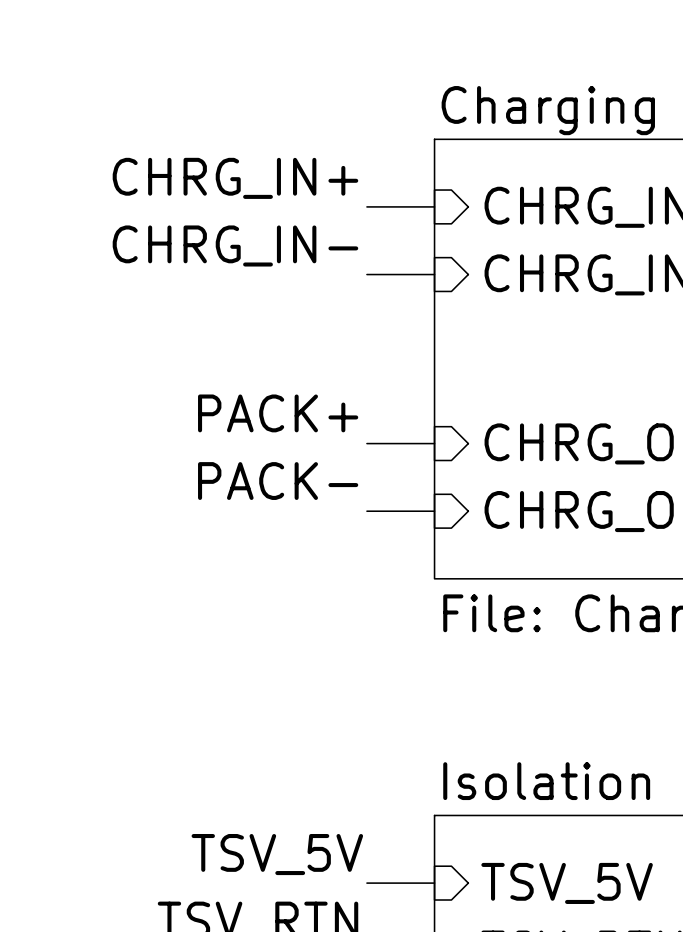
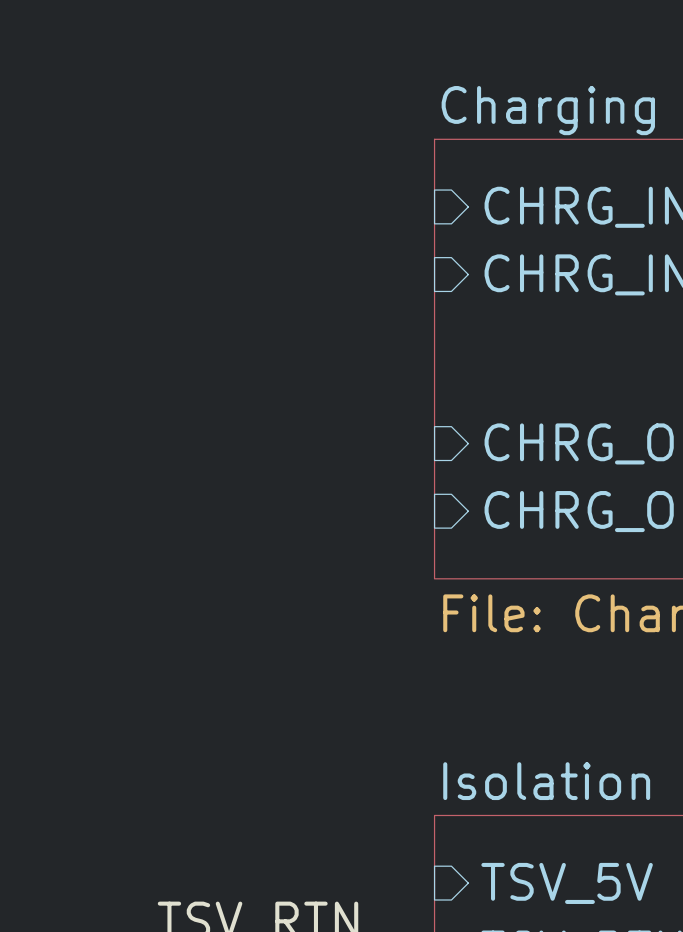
label: CHRG_IN+ (235, 178) -> none
wire: (366, 206) (434, 206) -> none
label: CHRG_IN- (235, 245) -> none
wire: (366, 274) (434, 274) -> none
label: PACK+ (278, 413) -> none
wire: (366, 443) (434, 443) -> none
label: PACK- (278, 481) -> none
wire: (366, 511) (434, 511) -> none
label: TSV_5V (277, 854) -> none
wire: (366, 883) (434, 883) -> none

